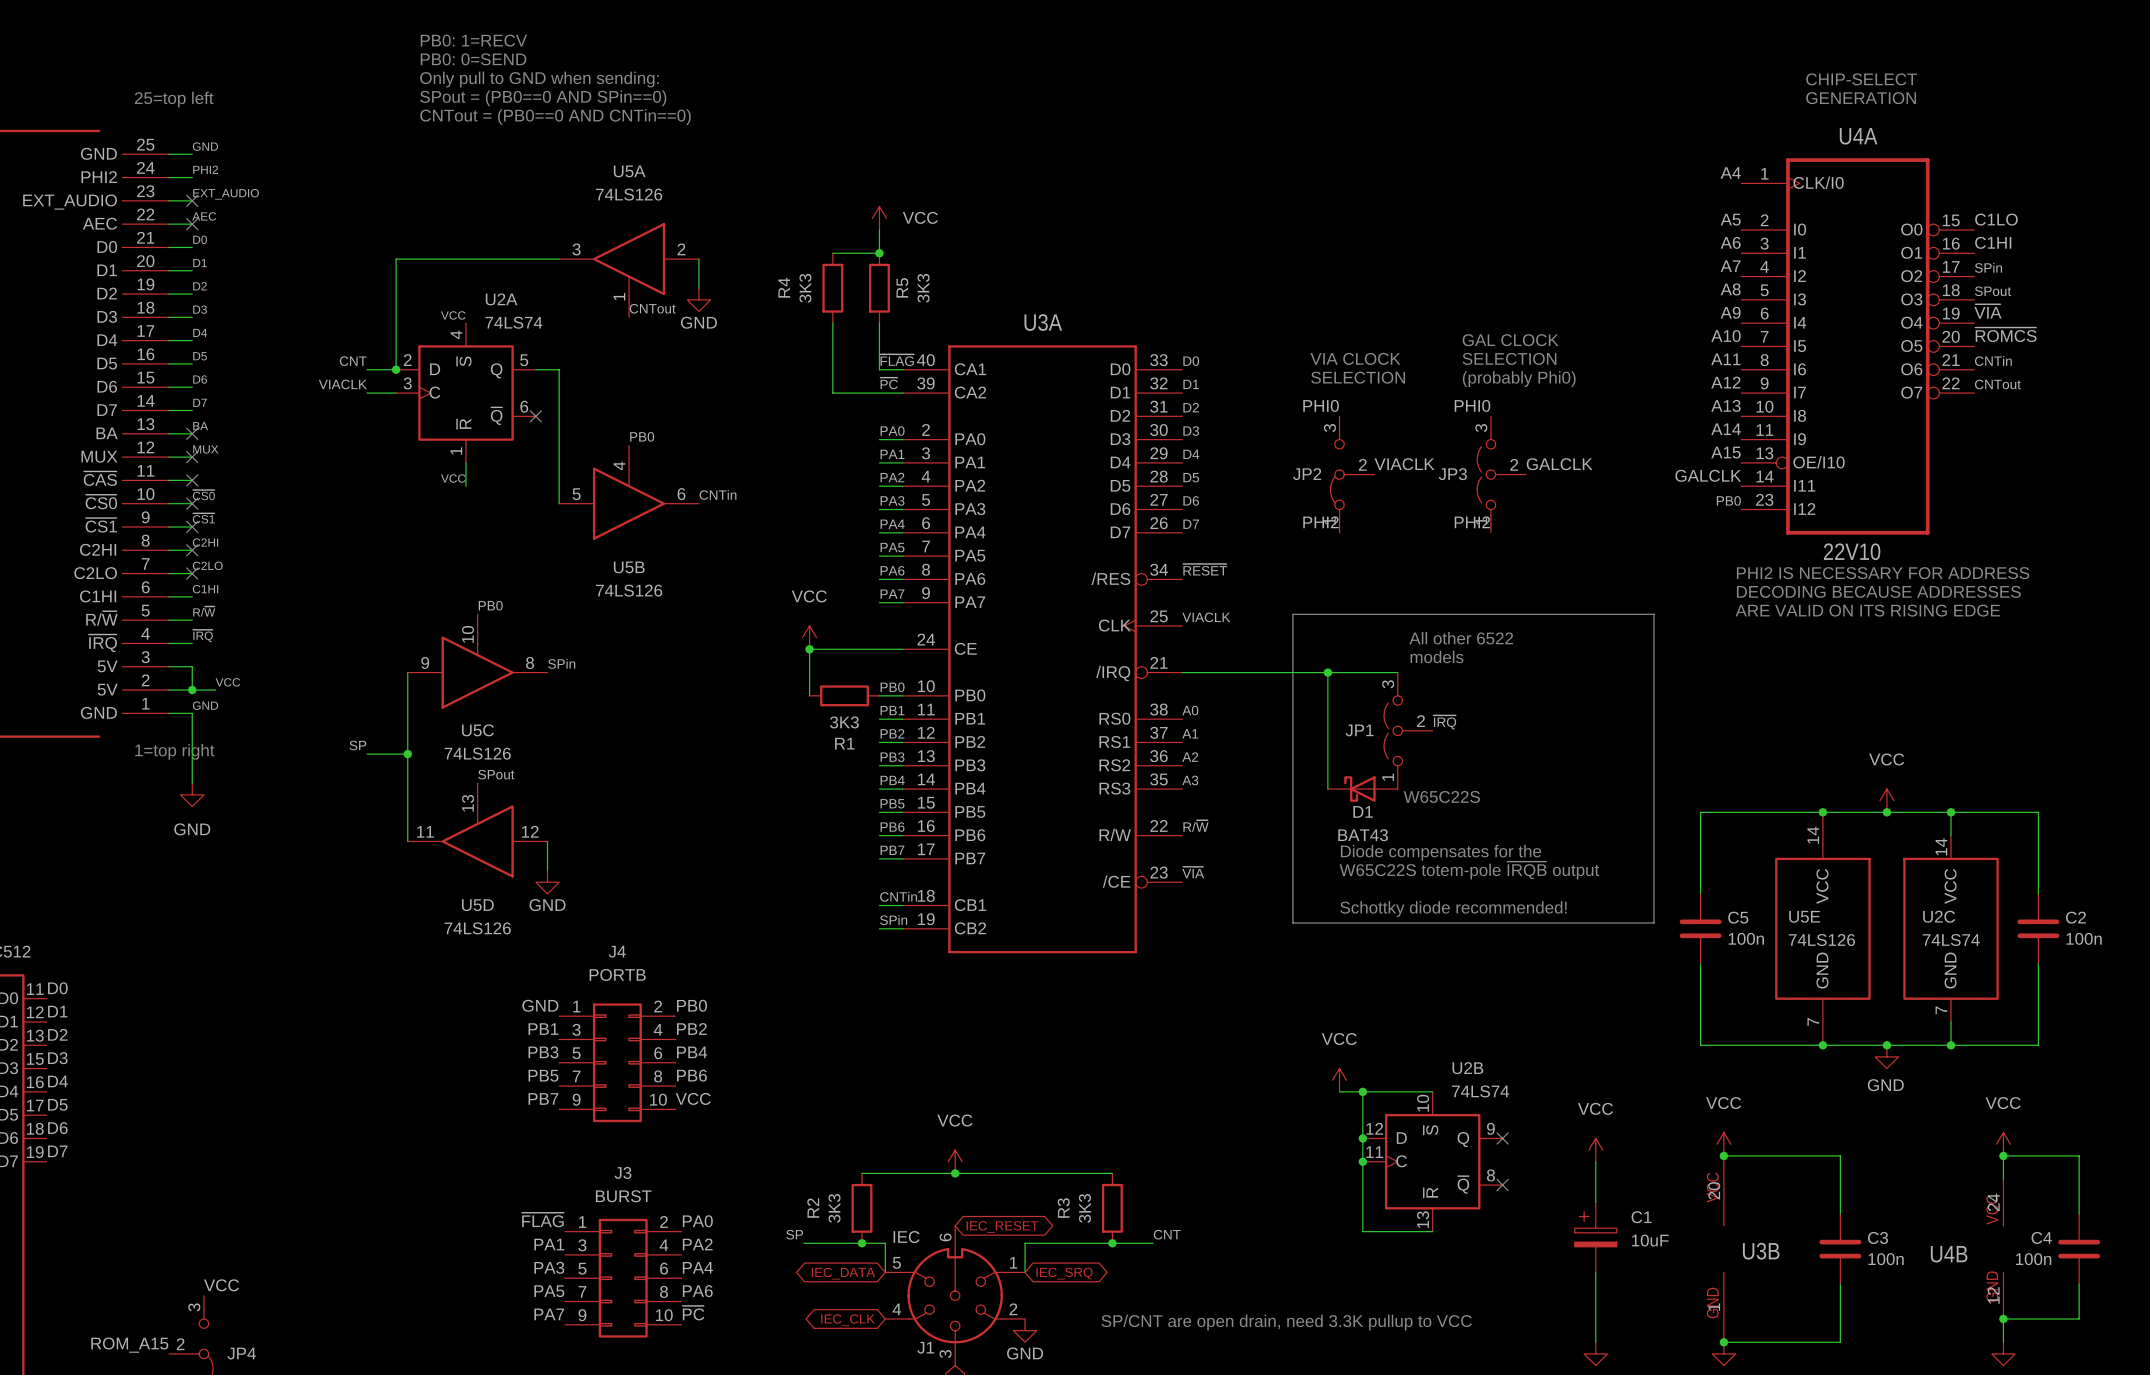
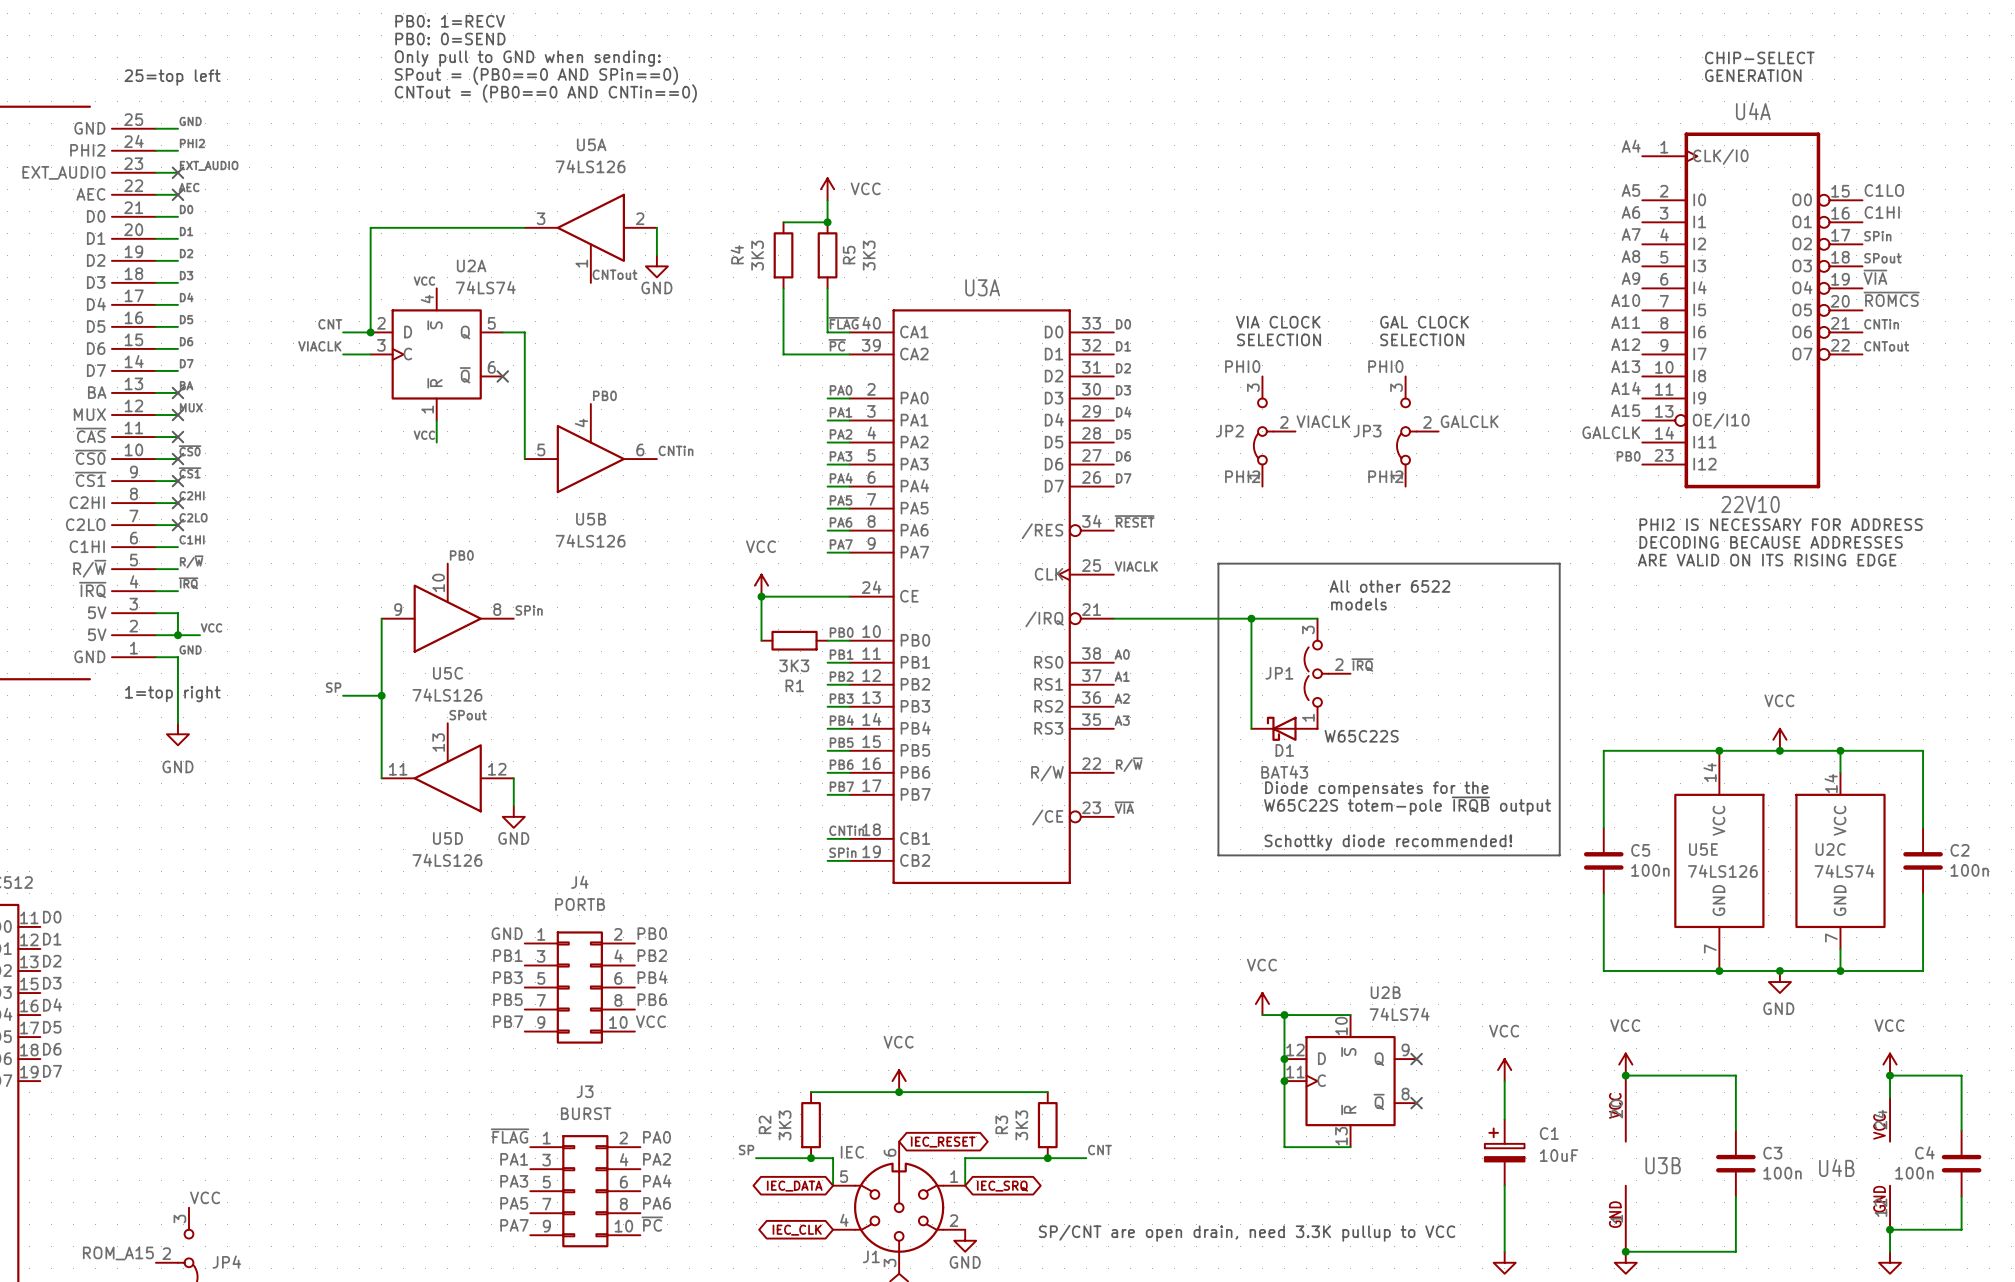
text: GAL CLOCK (1510, 340) -> none
text: SELECTION (1509, 358) -> GAL CLOCK (1424, 322)
text: (probably Phi0) (1519, 379) -> SELECTION (1422, 339)
JP3 symbol: [1477, 416, 1526, 533] -> [1396, 376, 1439, 487]

